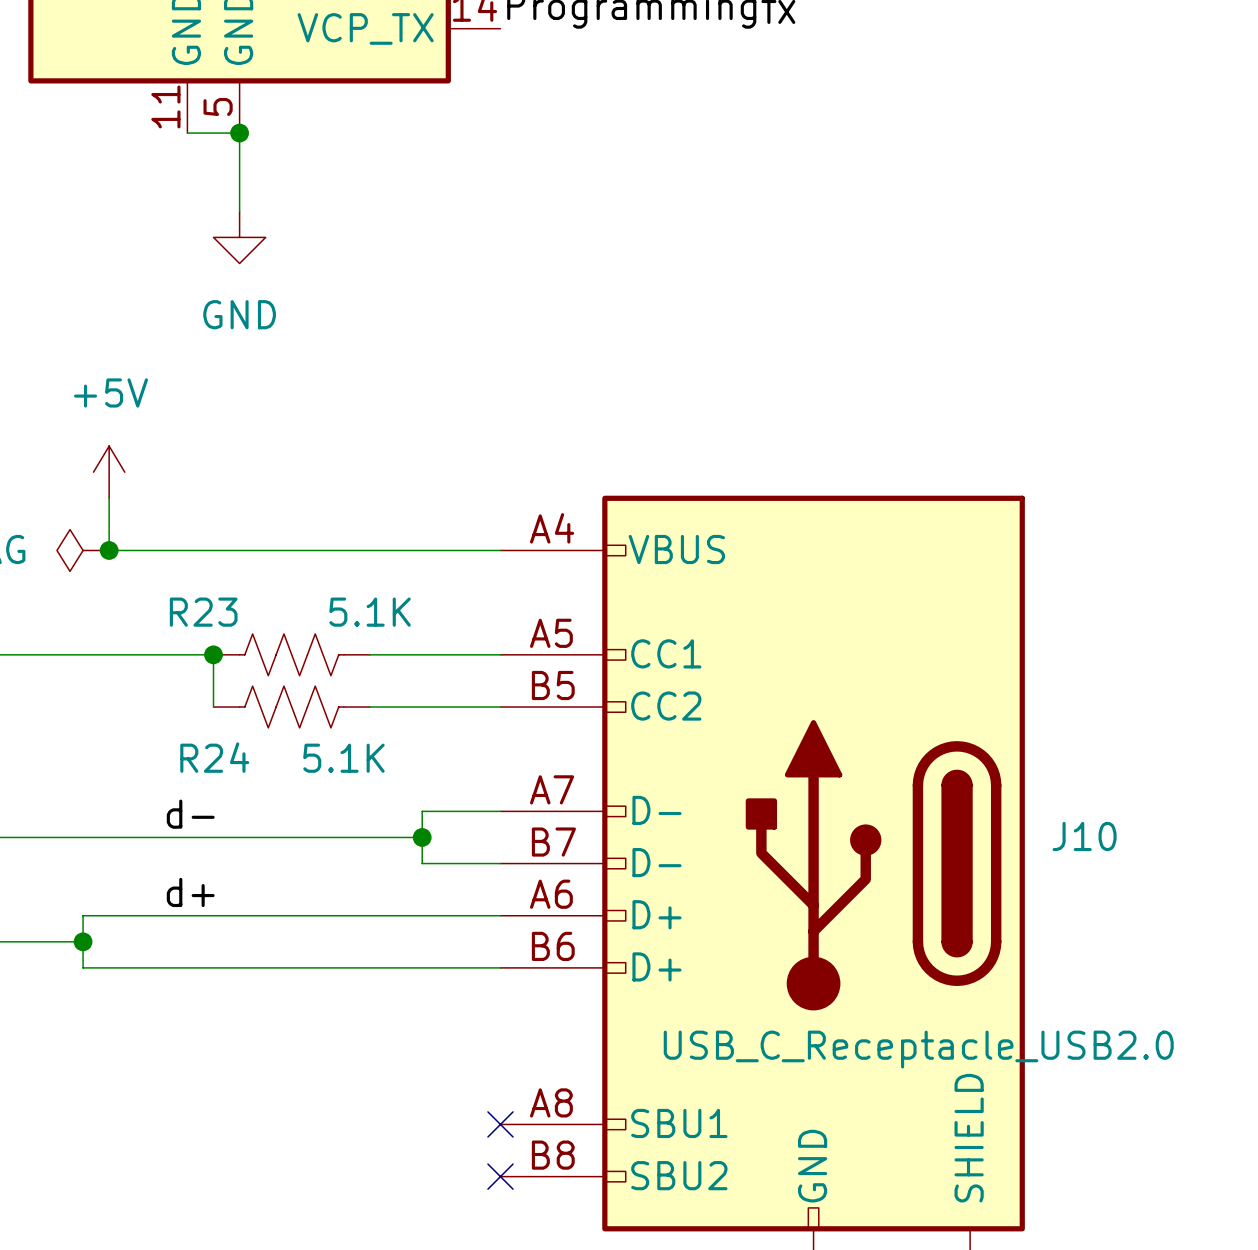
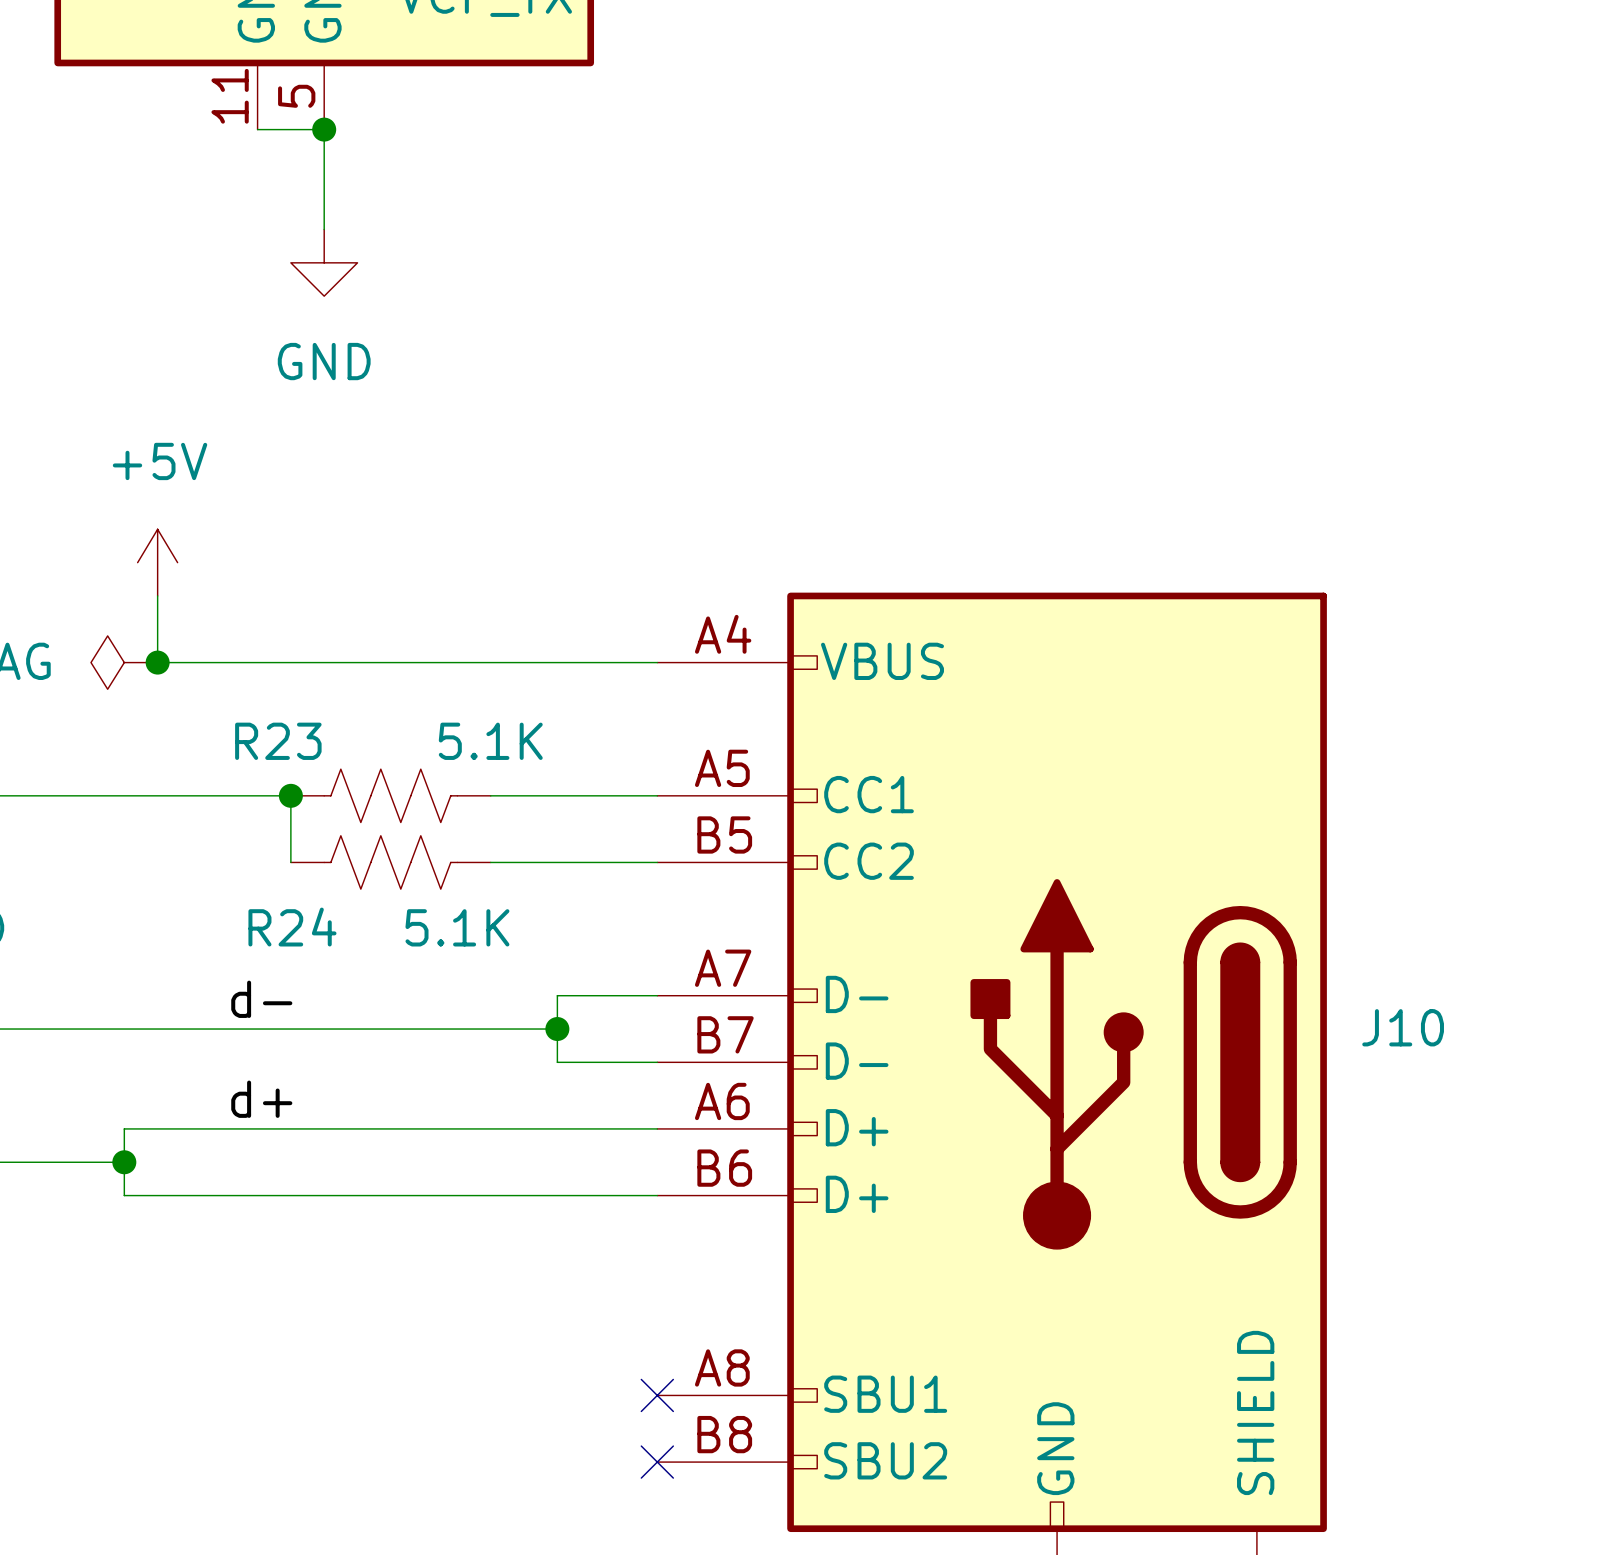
J10 value: USB_C_Receptacle_USB2.0 (918, 1049) -> none

